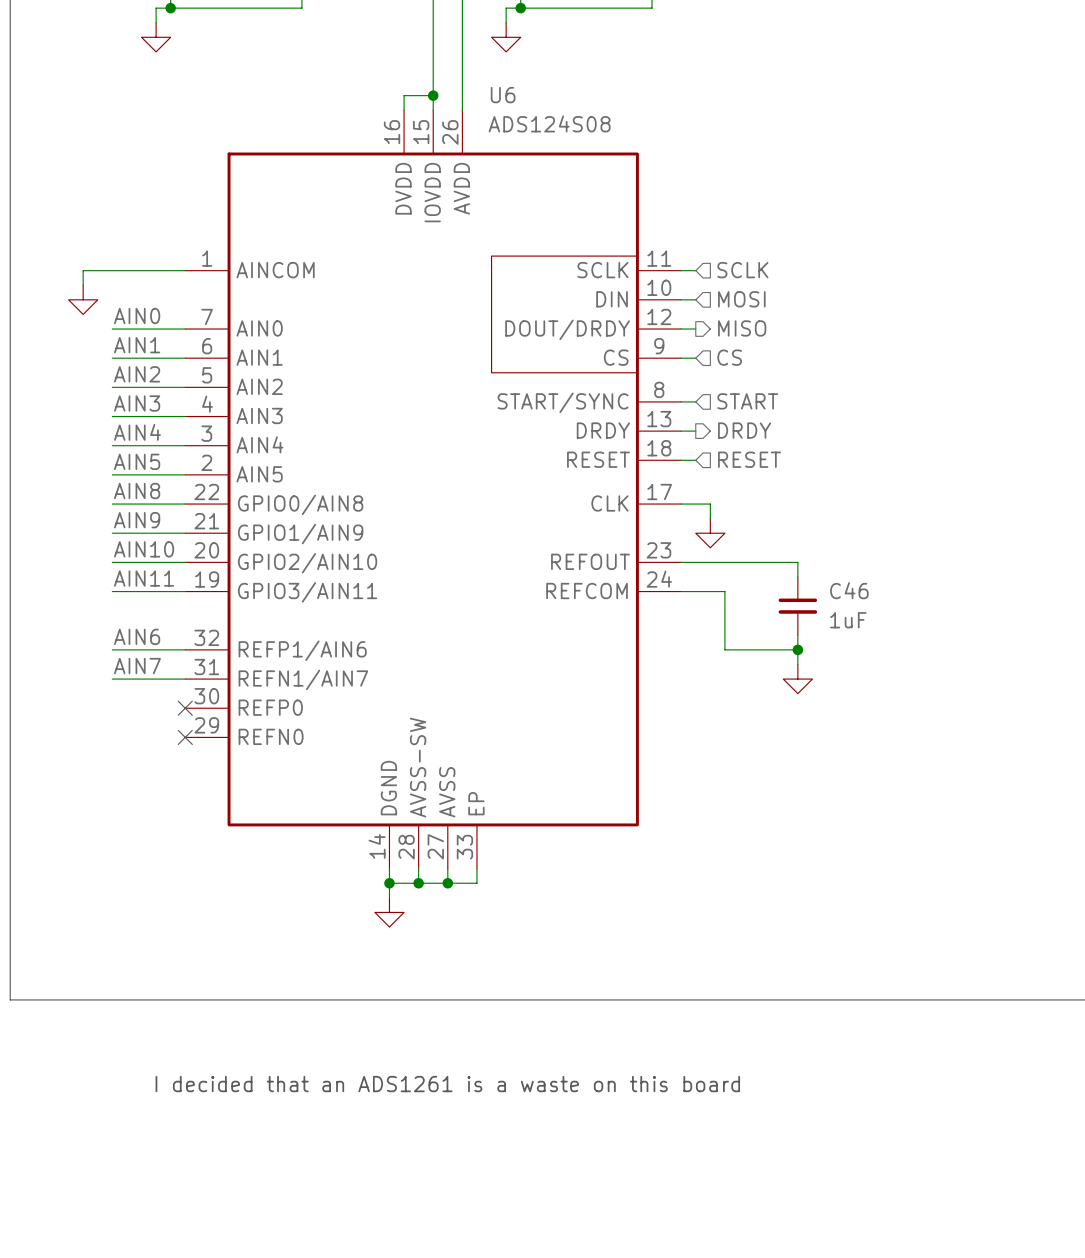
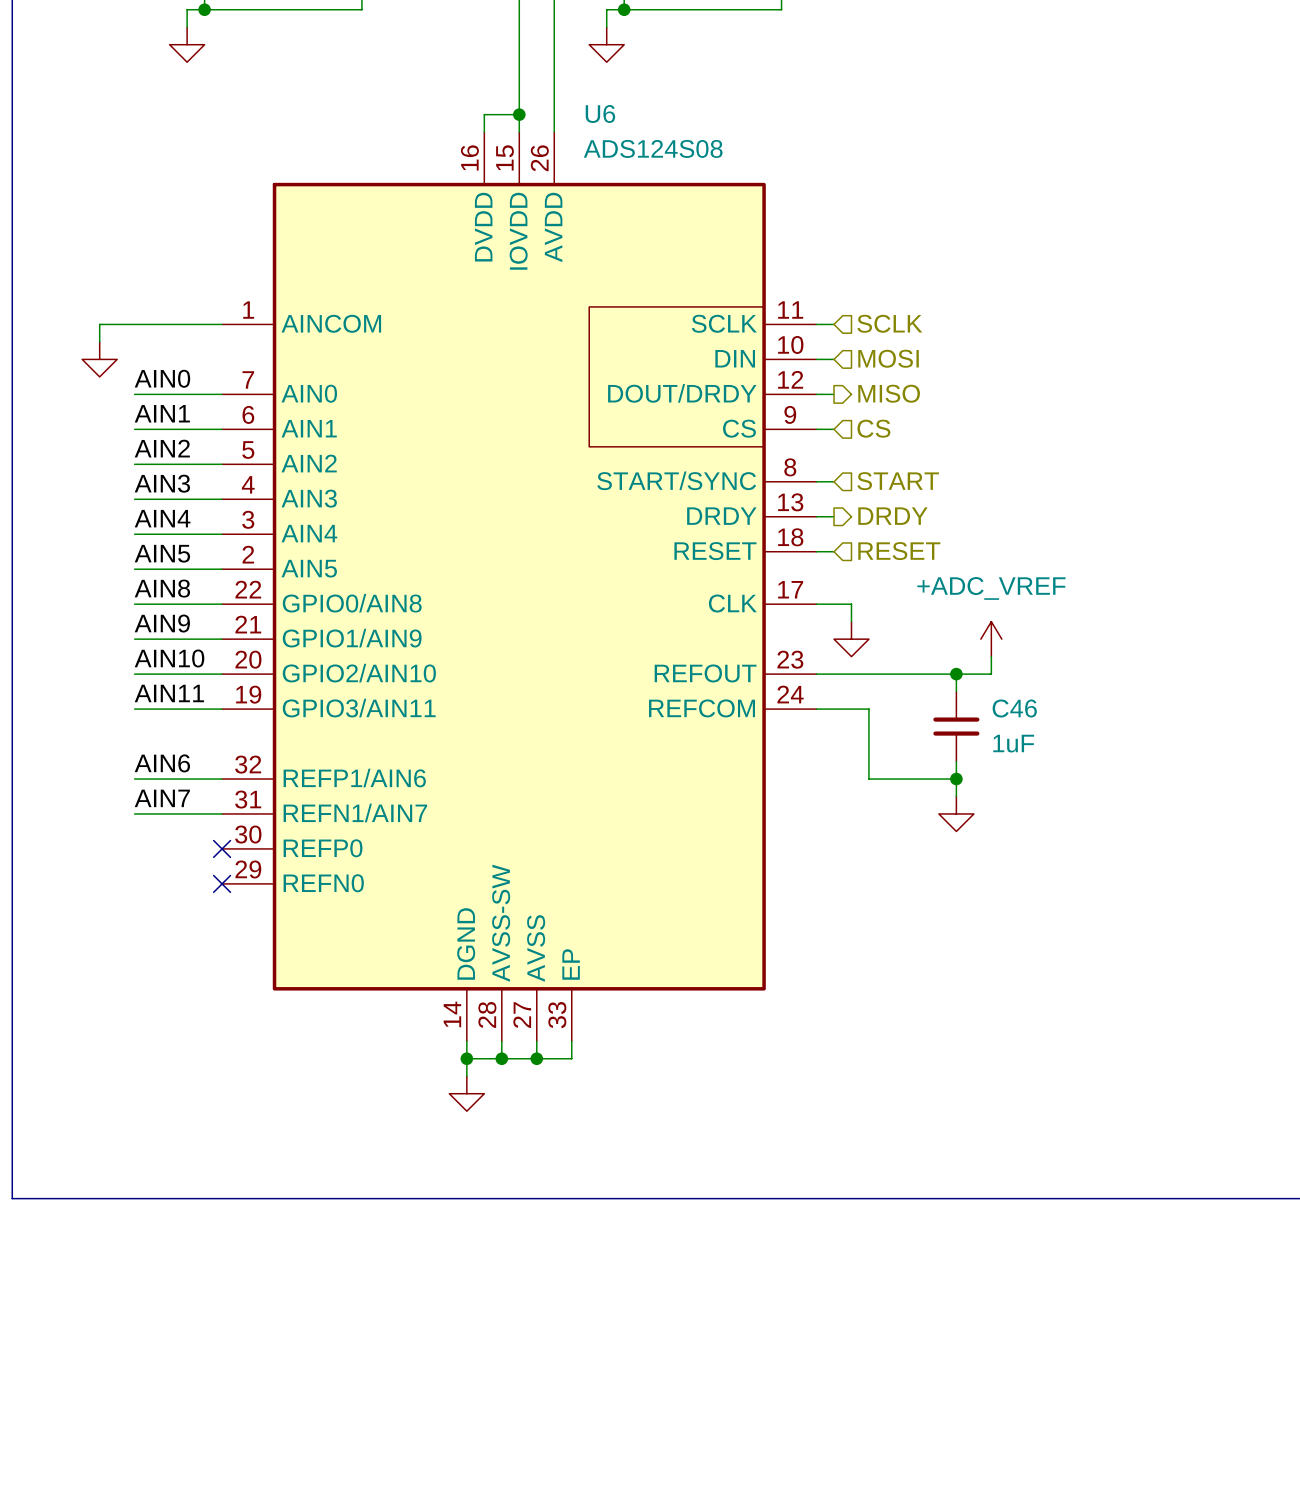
power symbol: none -> +ADC_VREF (991, 639)
wire: none -> (991, 656) (991, 674) (956, 674)
junction: none -> (956, 674)
text: I decided that an ADS1261 is a waste on this board (447, 1084) -> none

